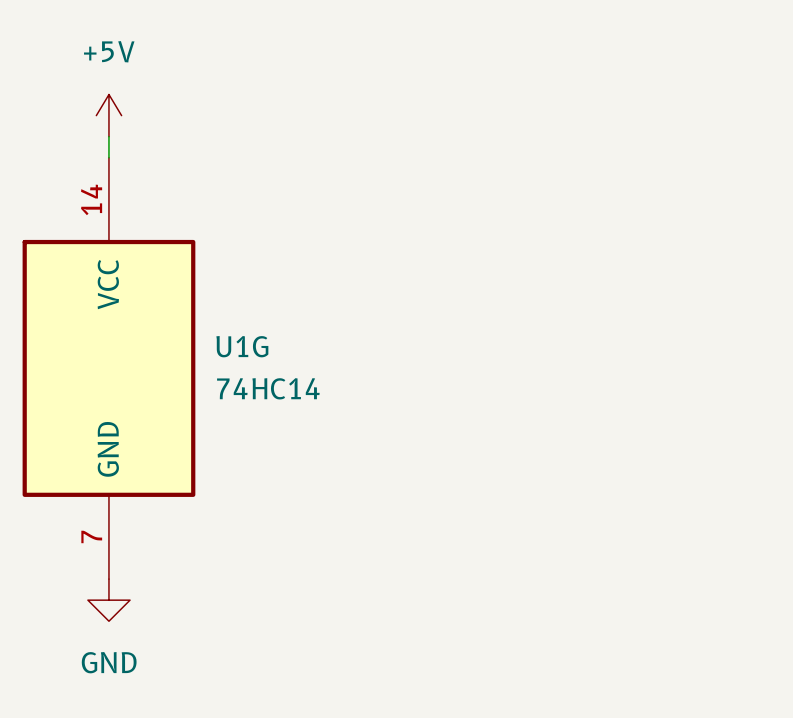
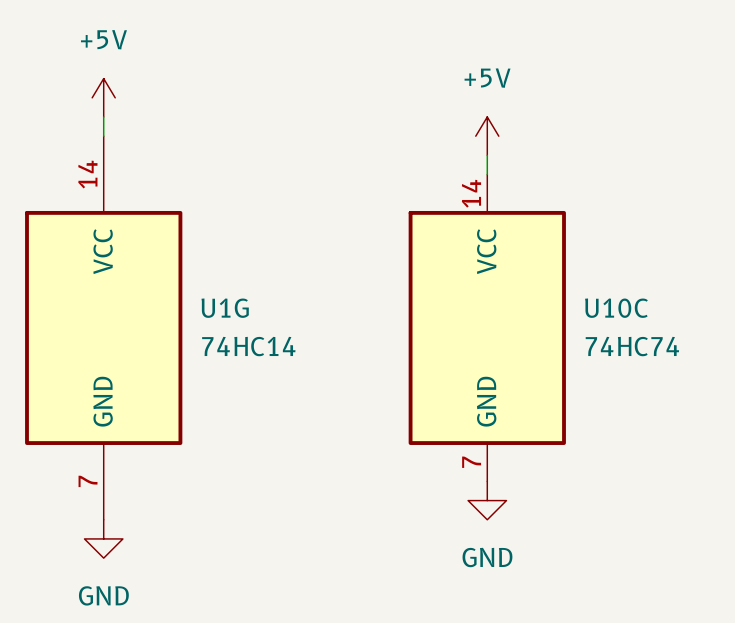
power symbol: none -> +5V (487, 136)
wire: none -> (487, 155) (487, 174)
U10C: none -> 74HC74 (487, 327)
power symbol: none -> GND (487, 500)

